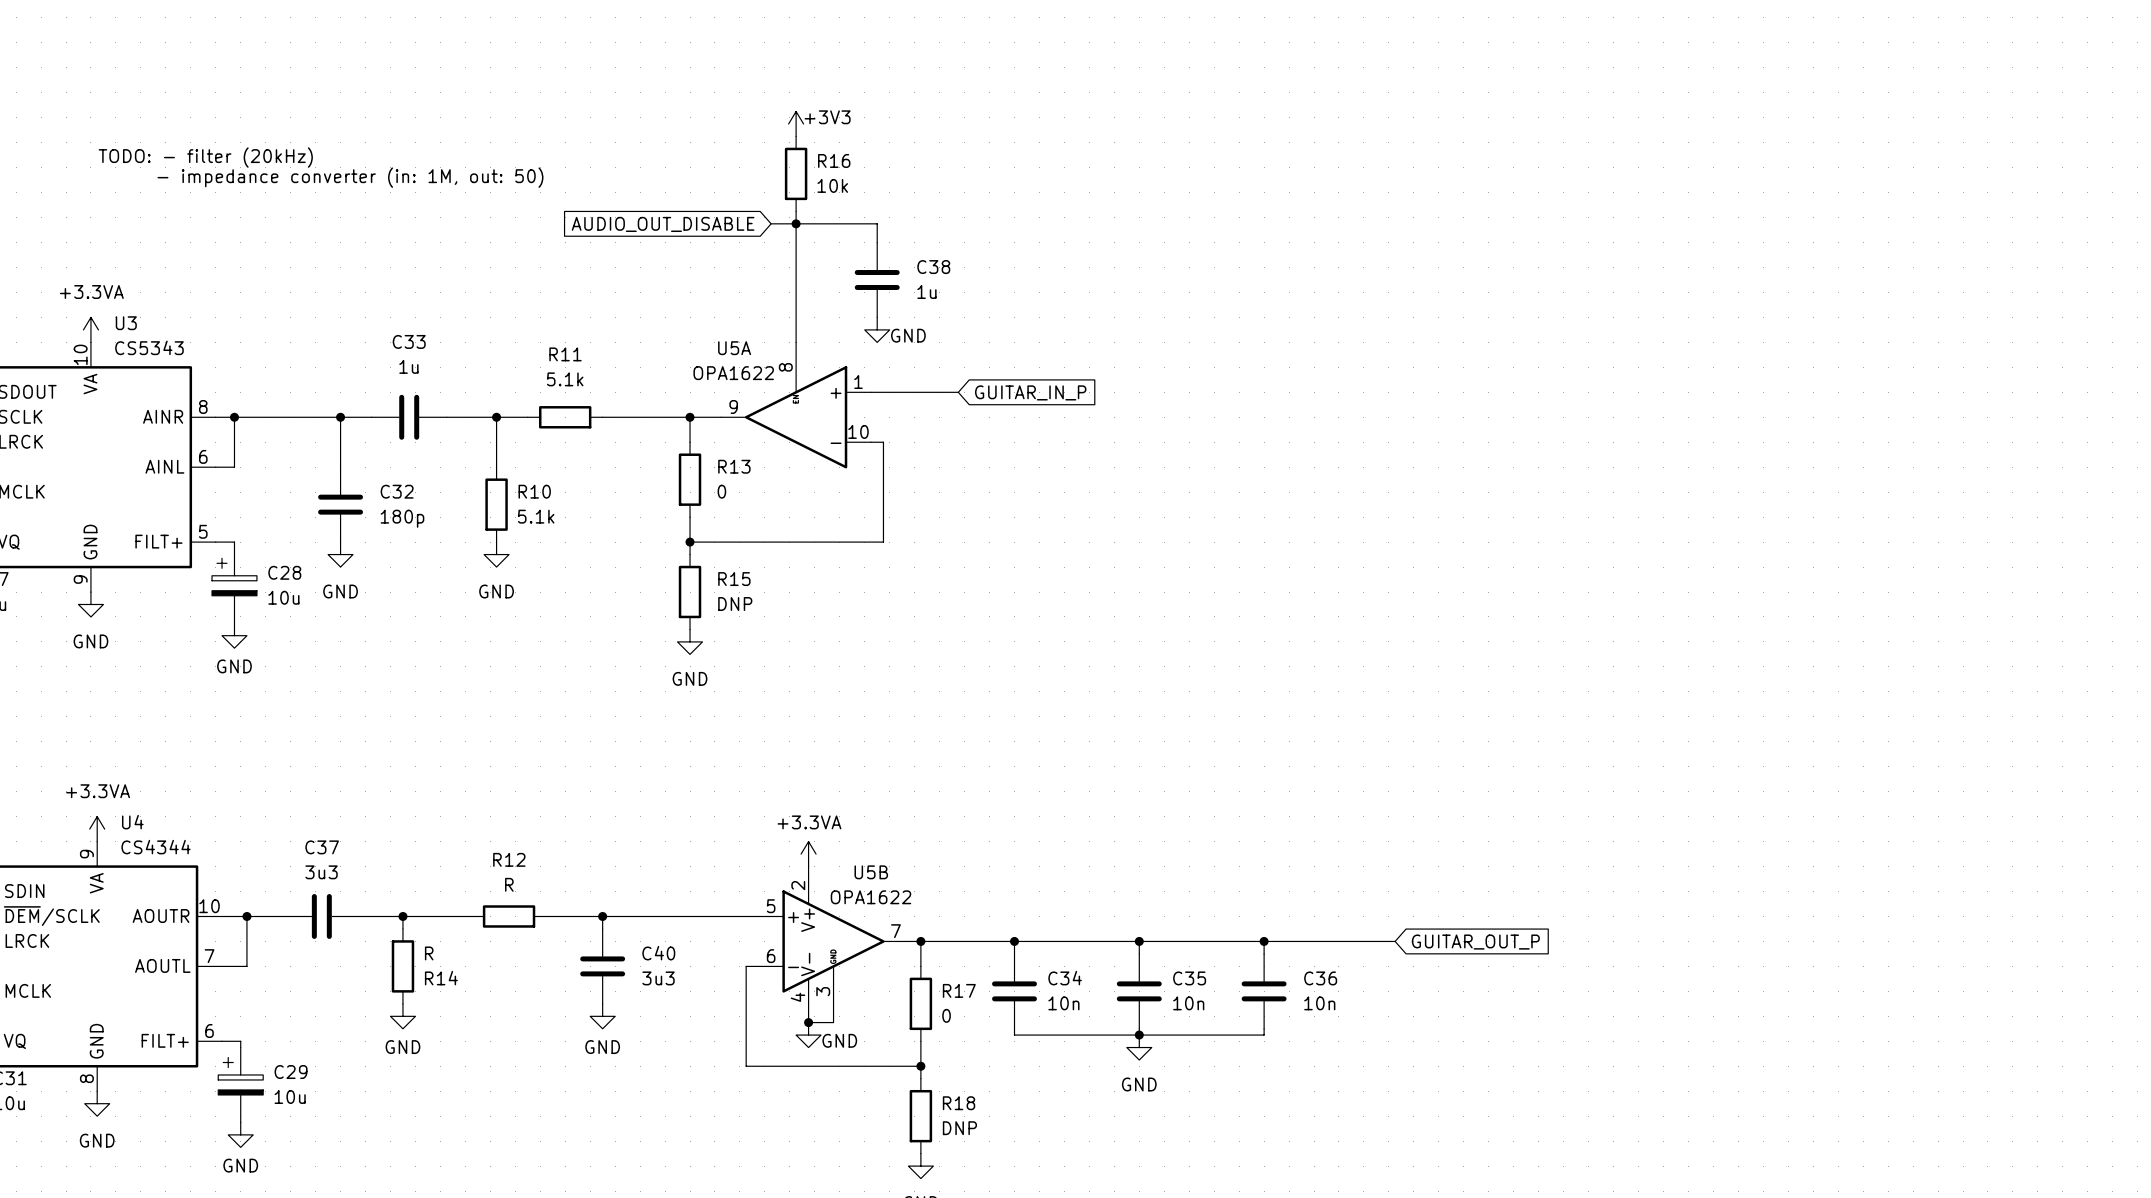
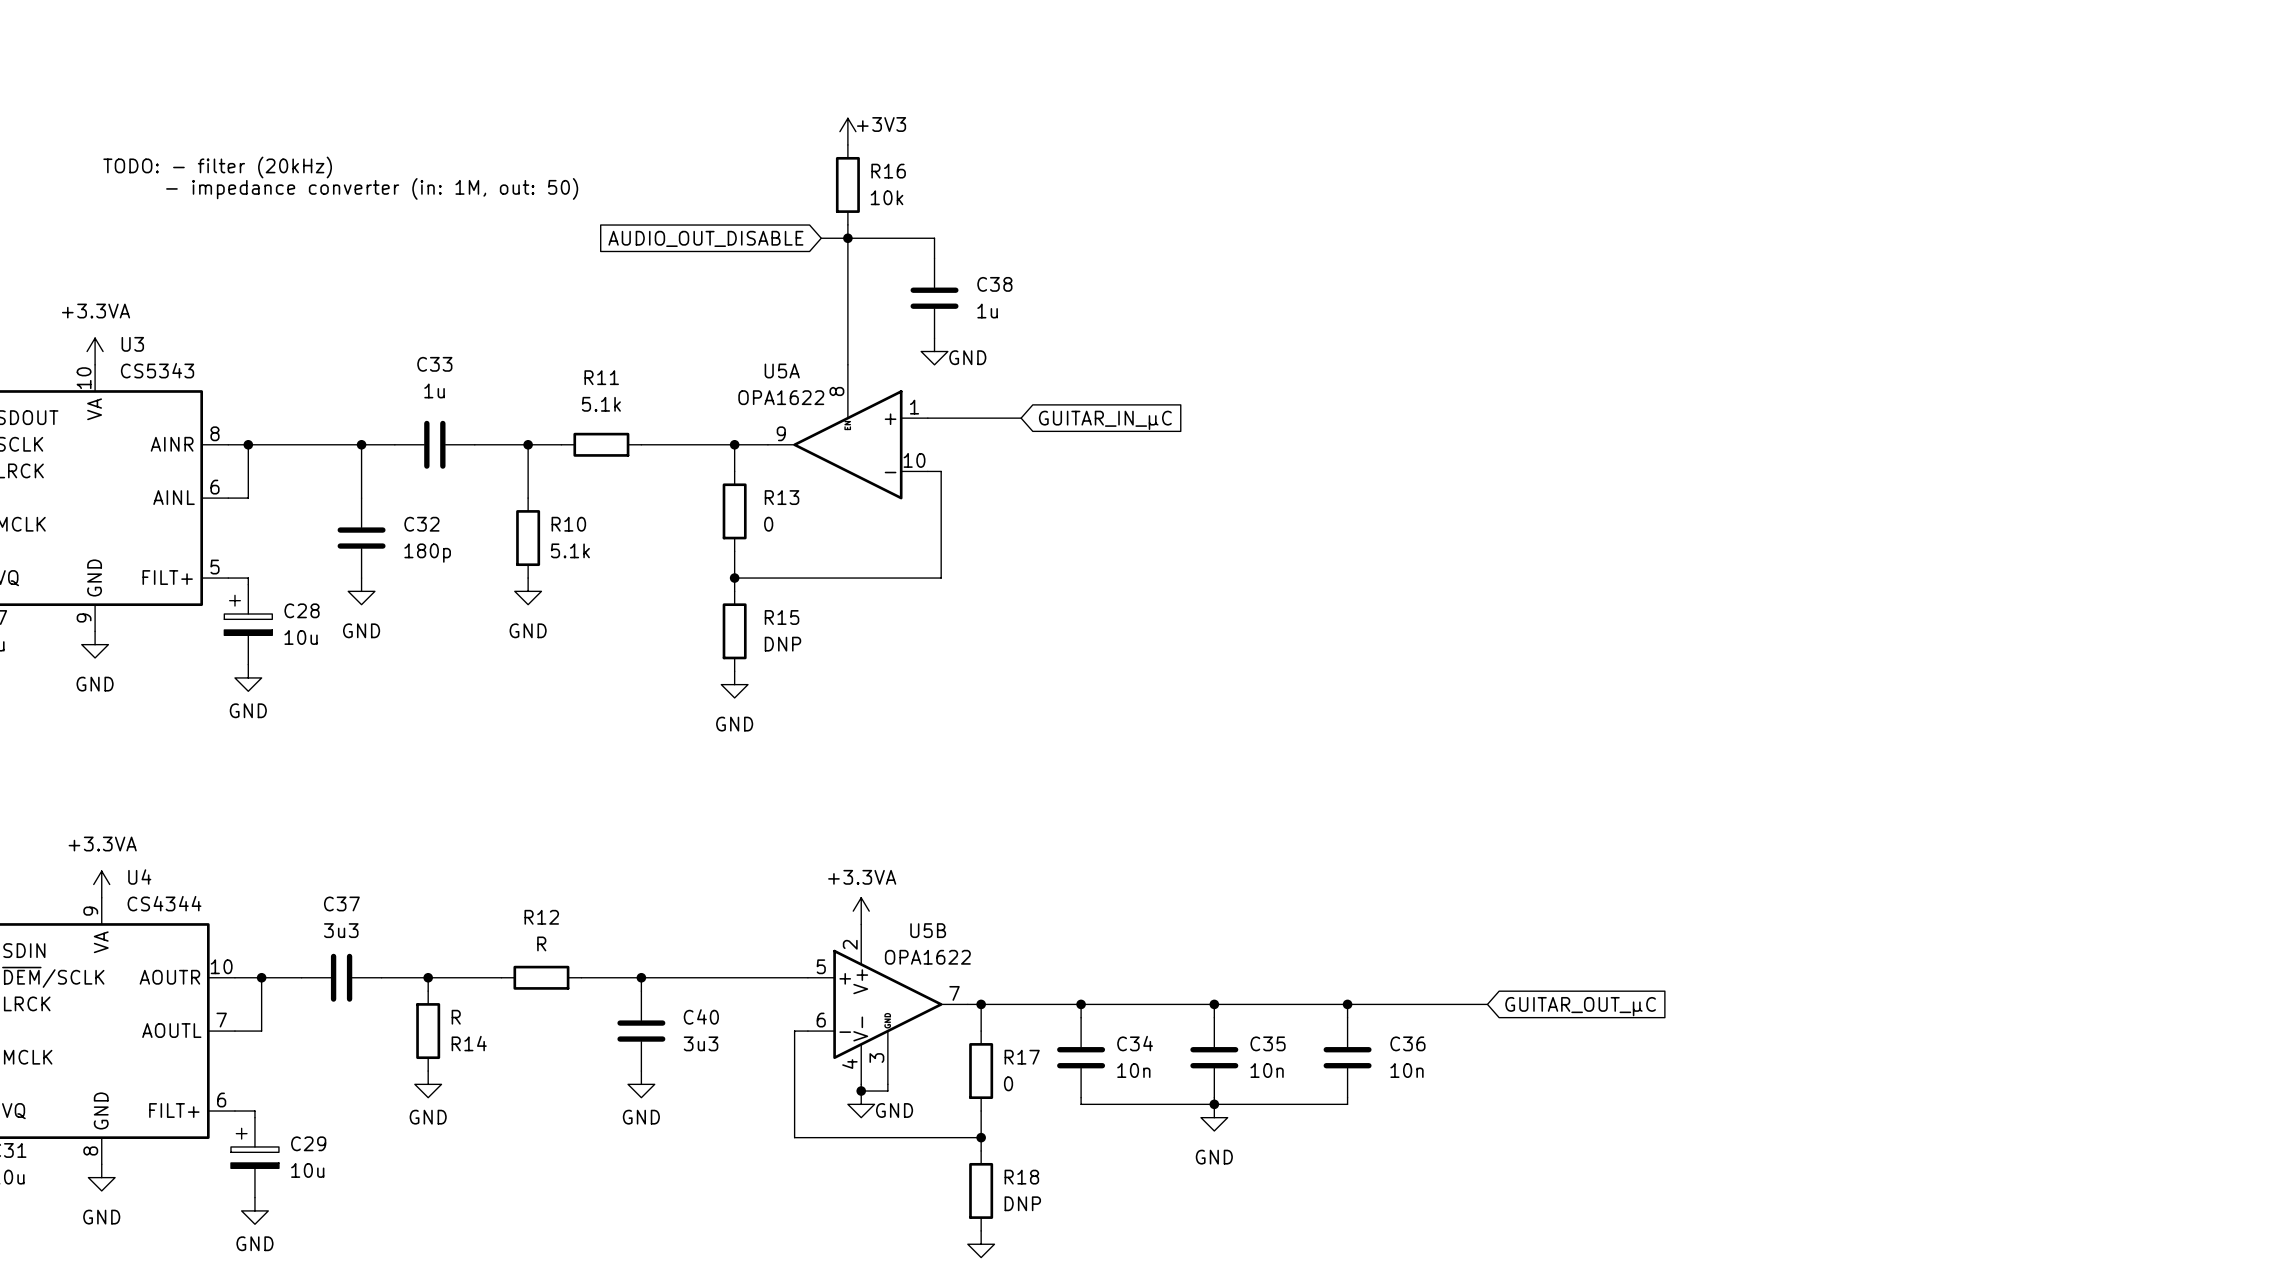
global label: GUITAR_IN_P (1030, 392) -> GUITAR_IN_µC (1105, 420)
global label: GUITAR_OUT_P (1475, 942) -> GUITAR_OUT_µC (1580, 1006)

